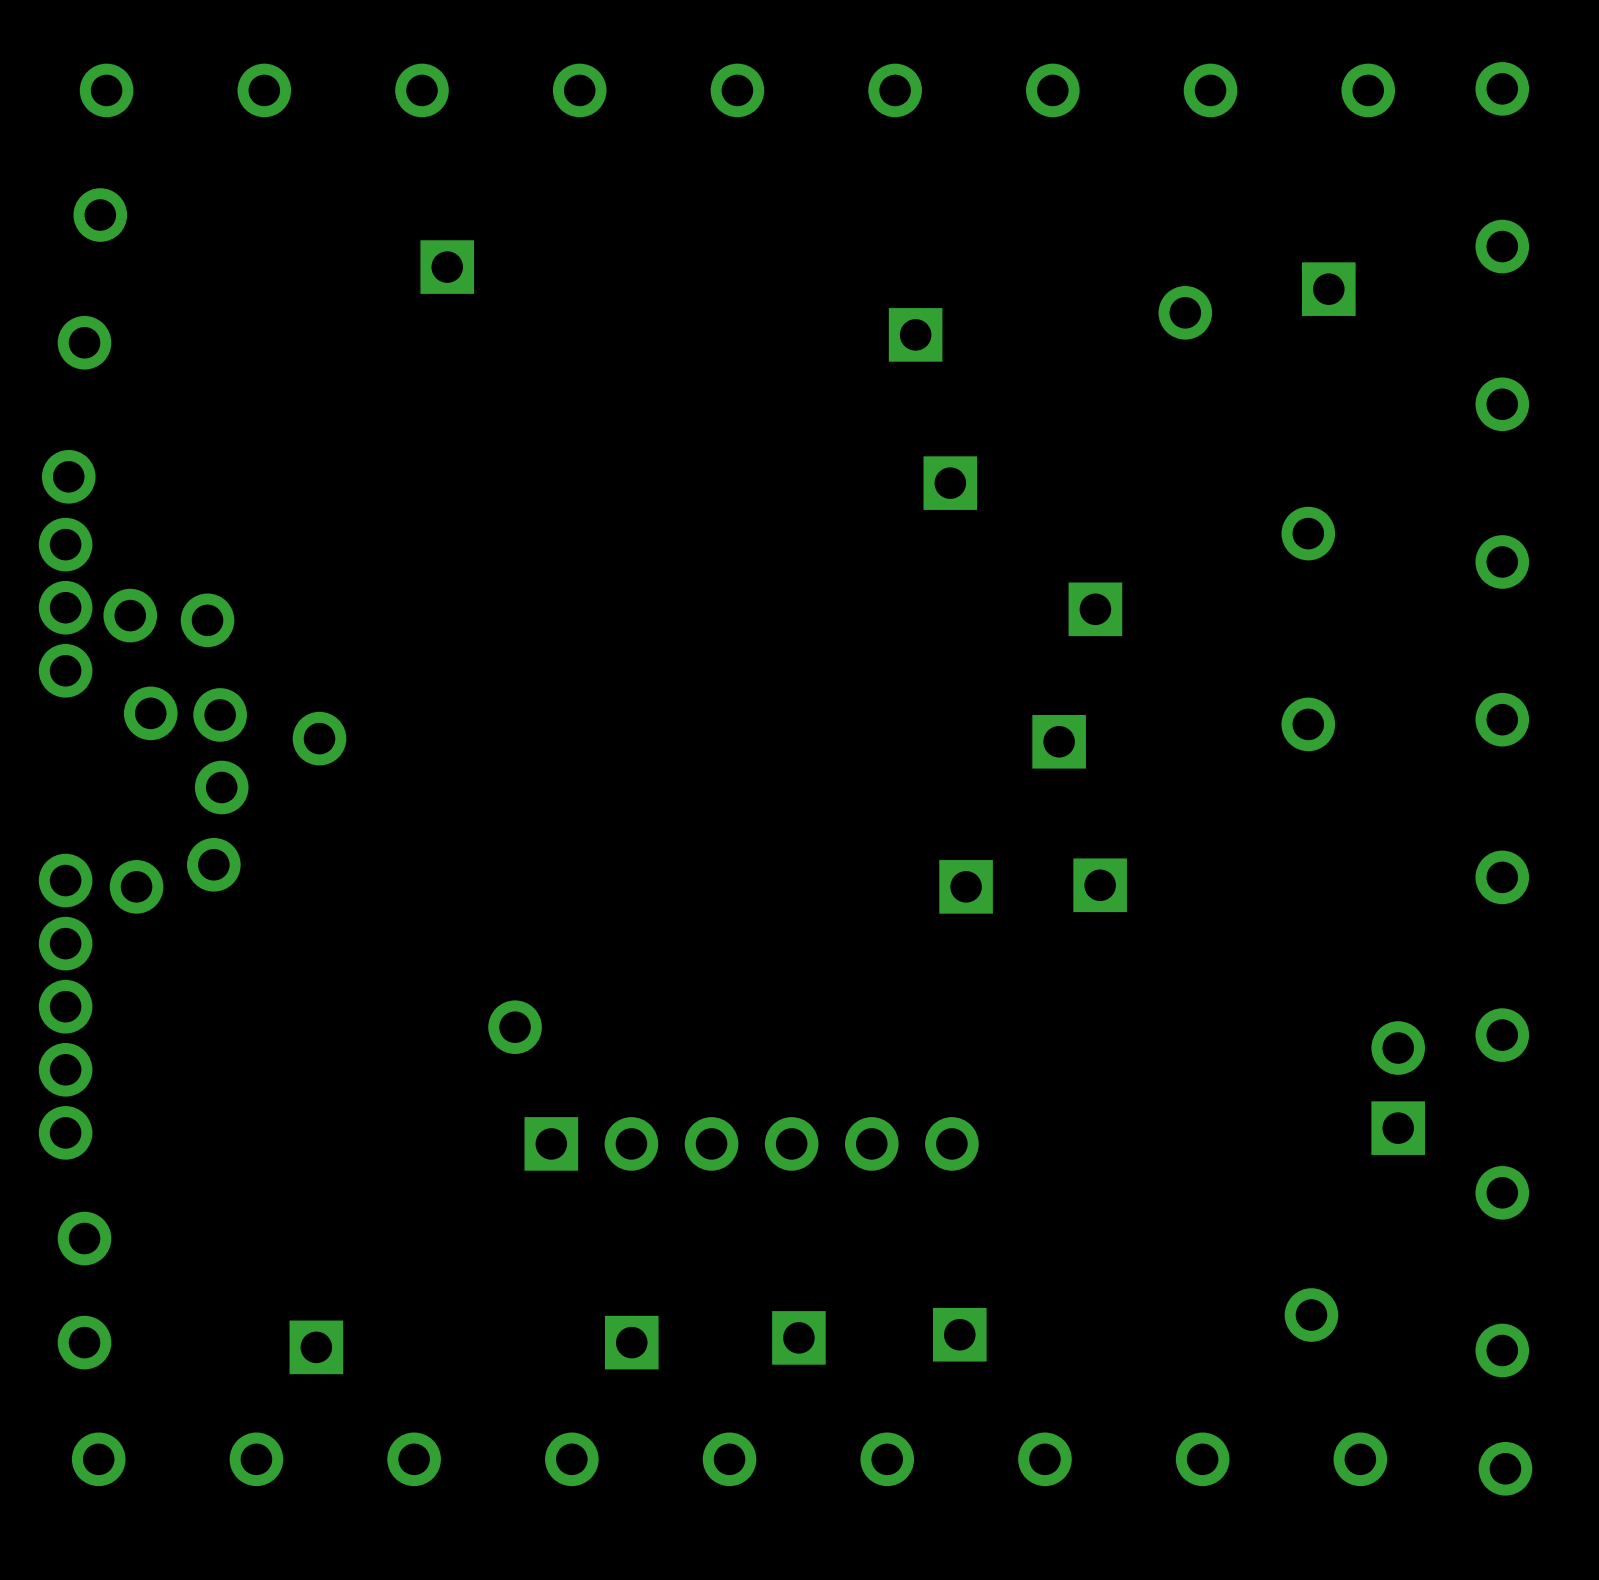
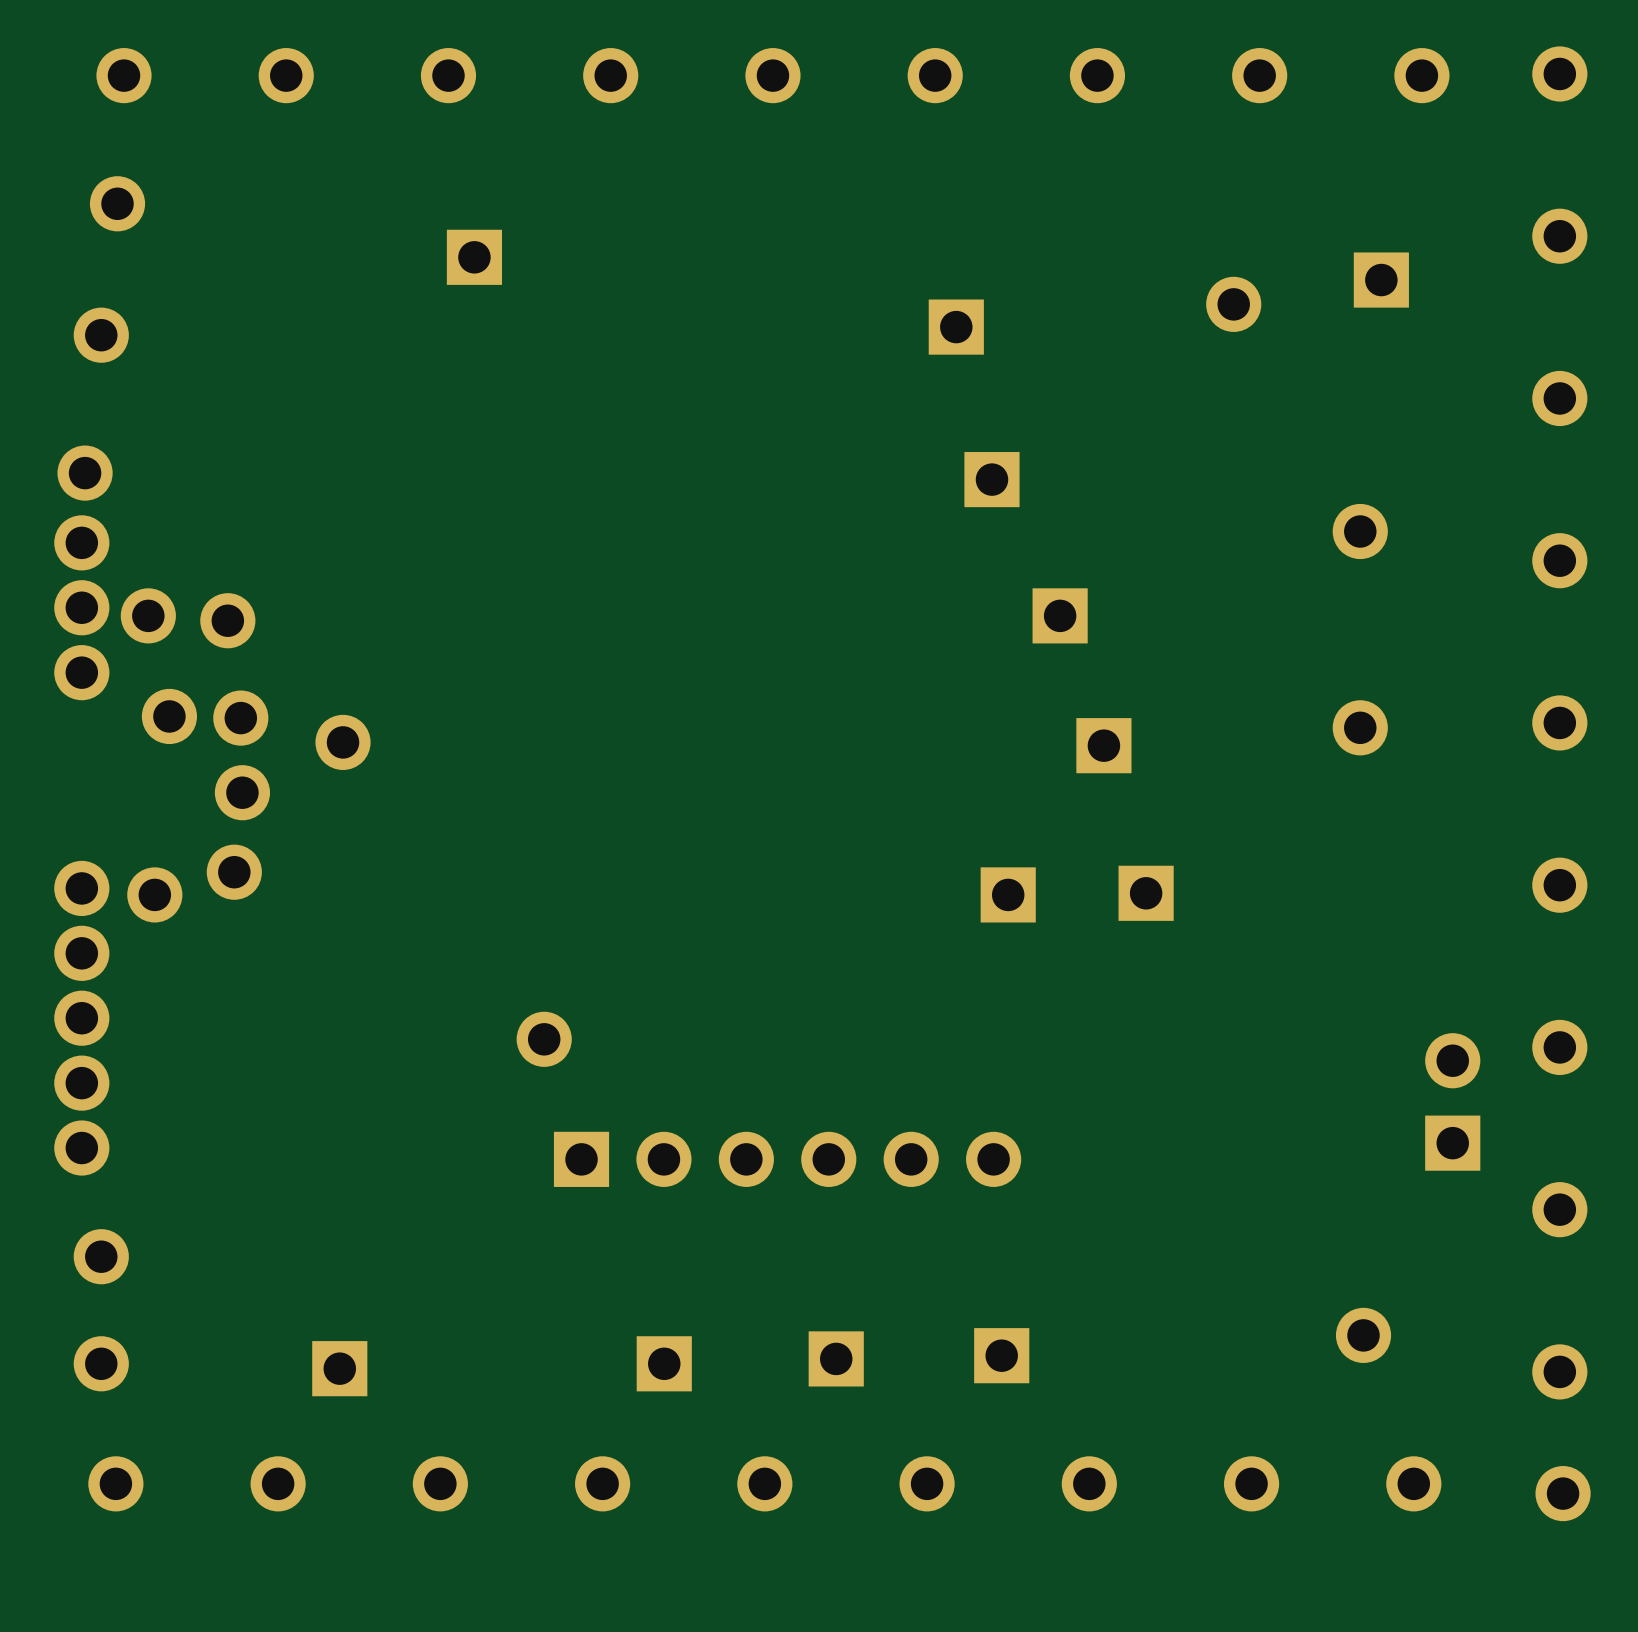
part position: (1095, 609) -> (1060, 615)

